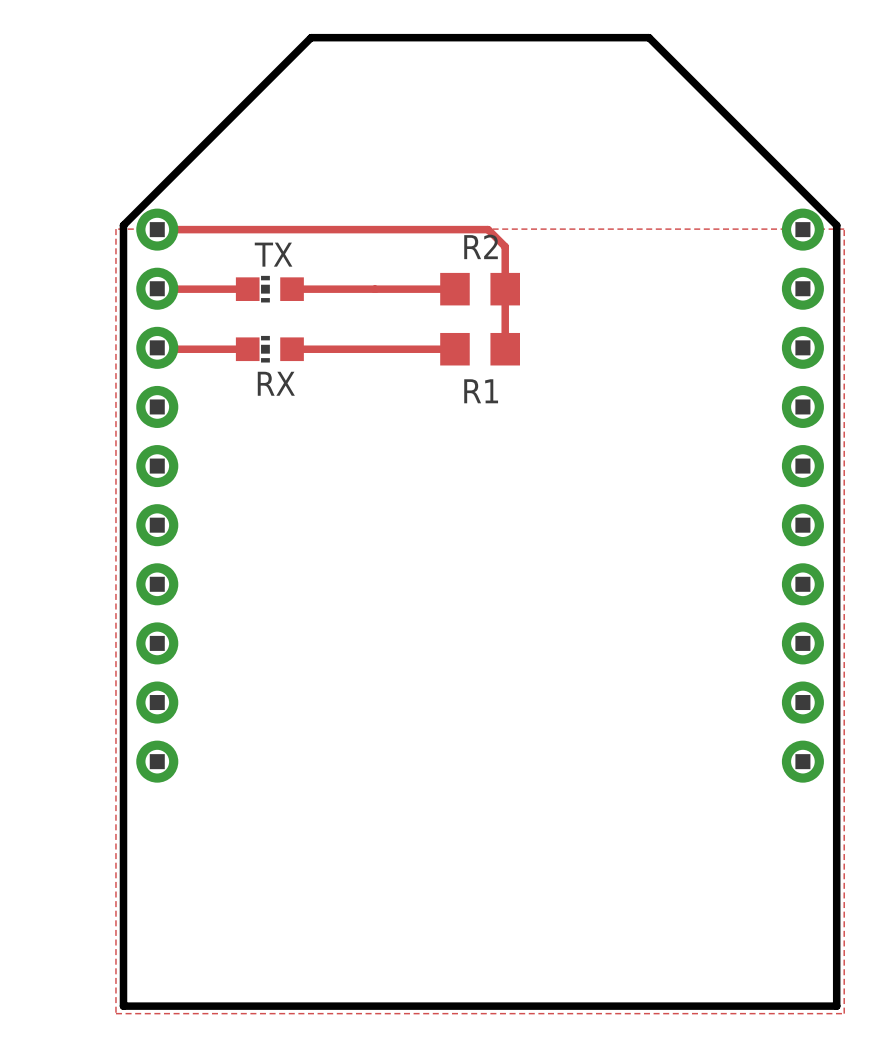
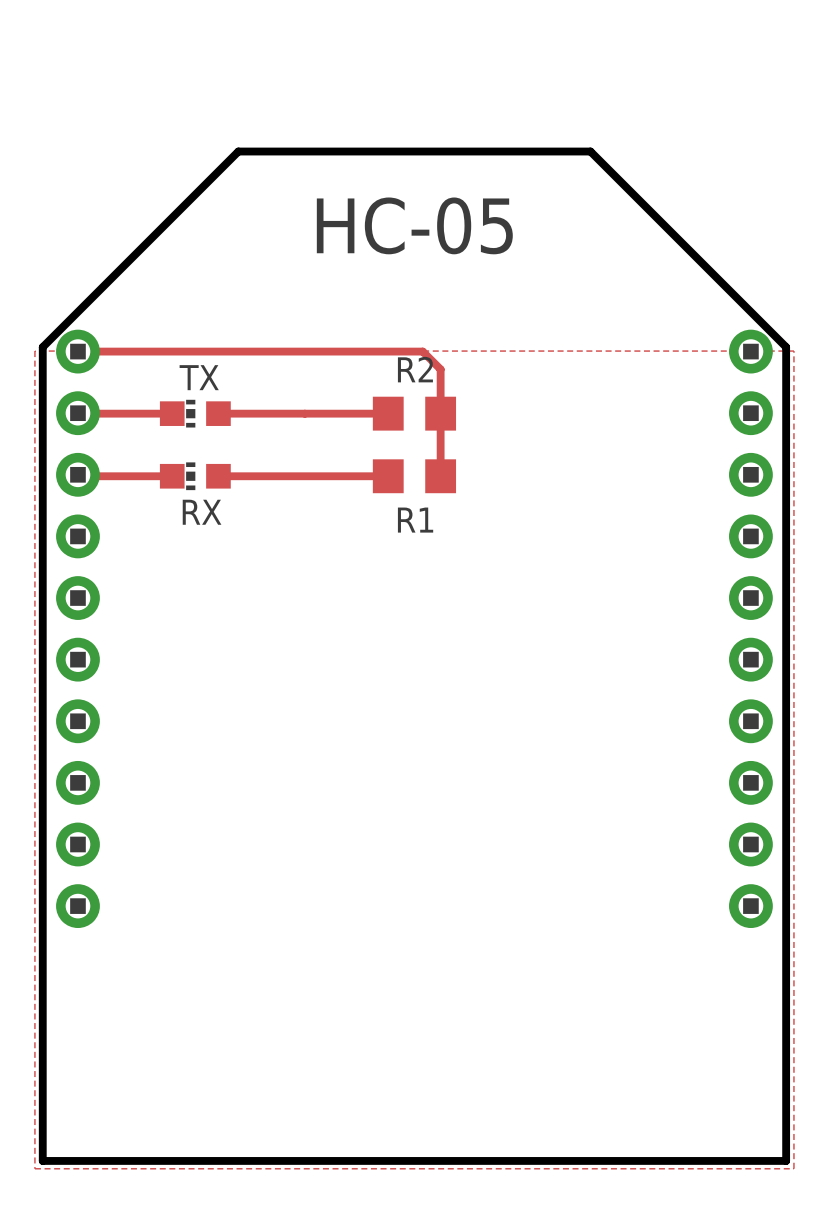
text: none -> HC-05 (414, 225)

